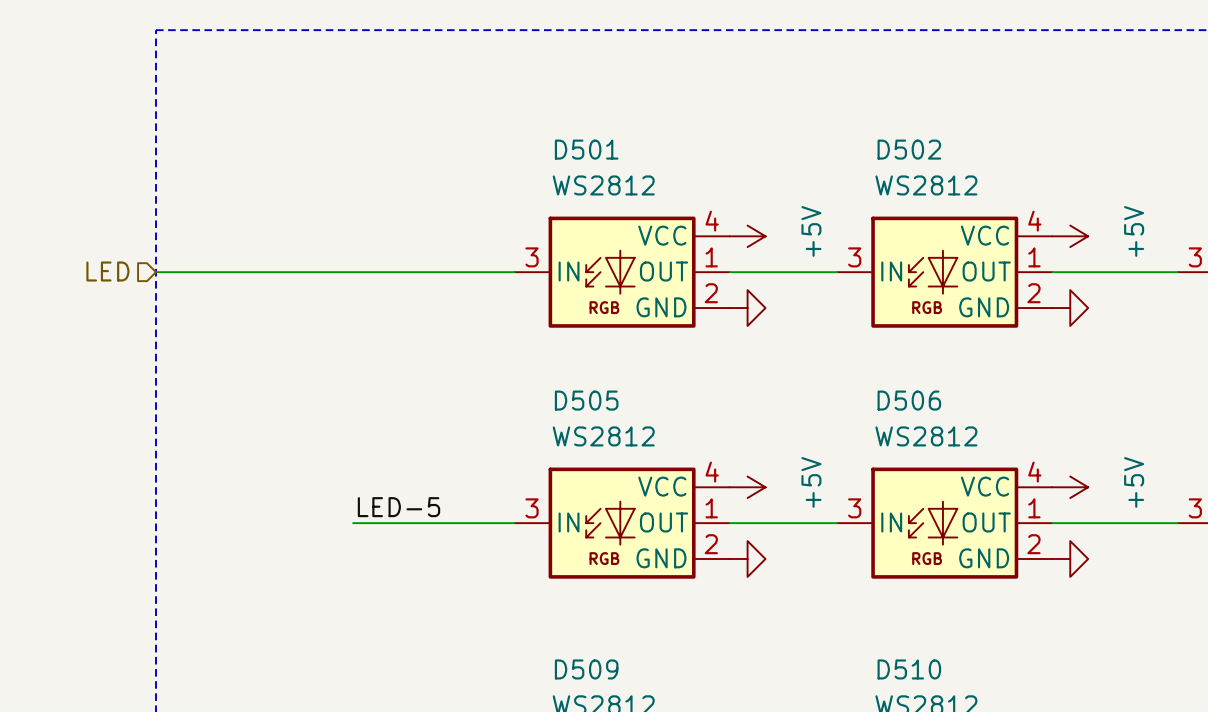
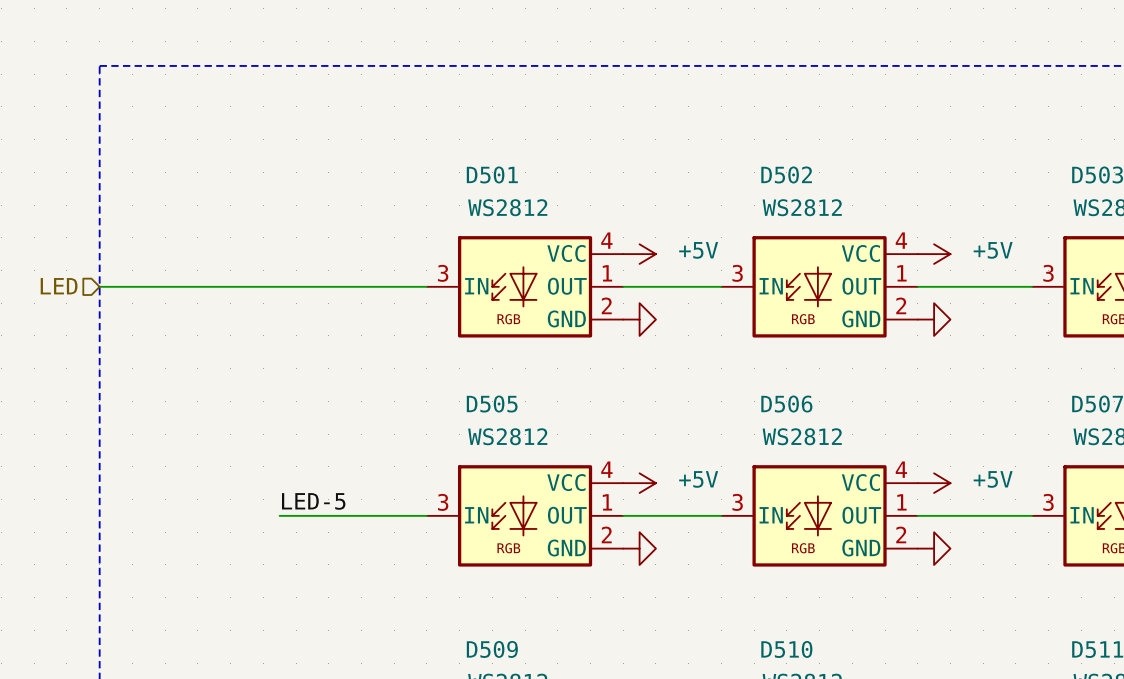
power symbol text rotation: 0° (811, 231) -> 90° clockwise (698, 250)
power symbol text rotation: 0° (1134, 231) -> 90° clockwise (993, 250)
power symbol text rotation: 0° (811, 482) -> 90° clockwise (698, 479)
power symbol text rotation: 0° (1134, 482) -> 90° clockwise (993, 479)

